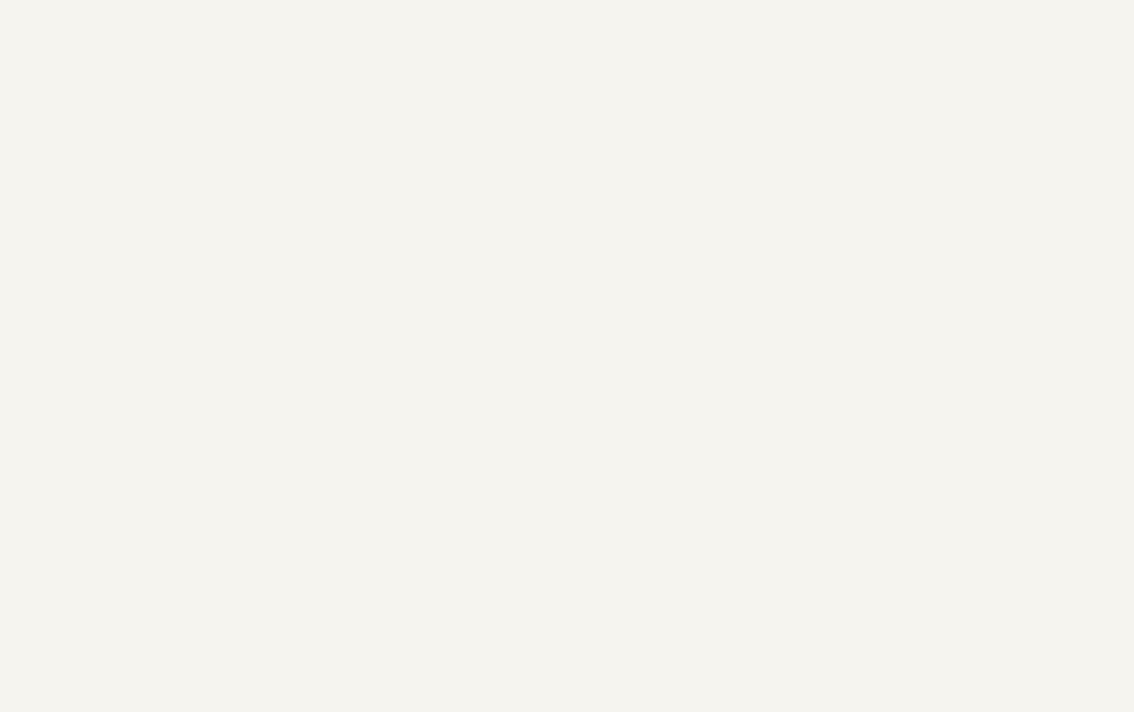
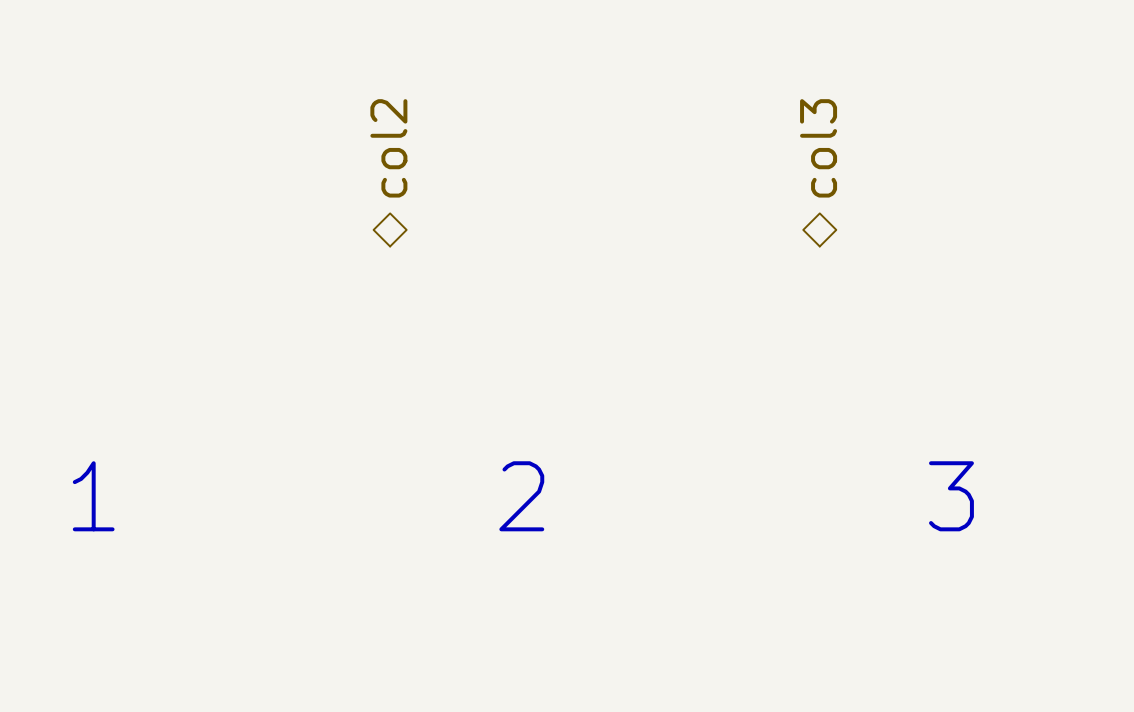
hierarchical label: none -> col2 (388, 148)
hierarchical label: none -> col3 (818, 148)
text: none -> 2 (521, 496)
text: none -> 1 (93, 496)
text: none -> 3 (951, 496)

